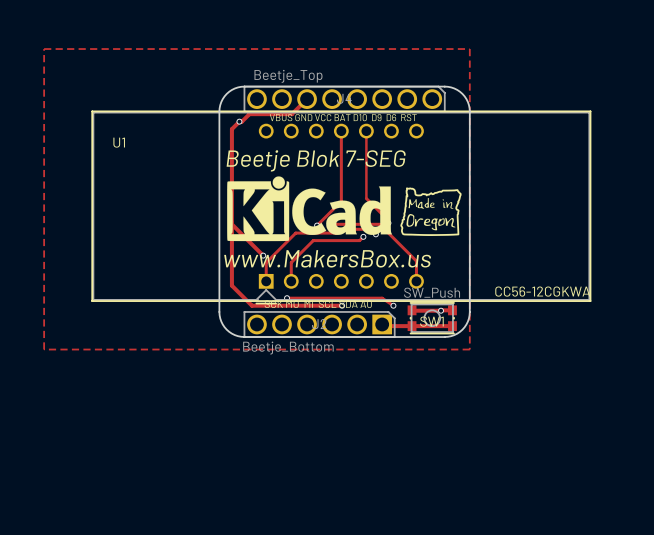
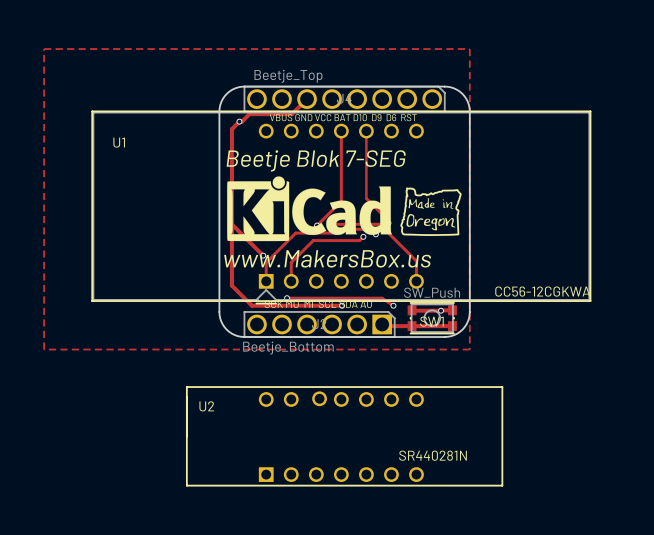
U2: none -> SR440281N (344, 436)

